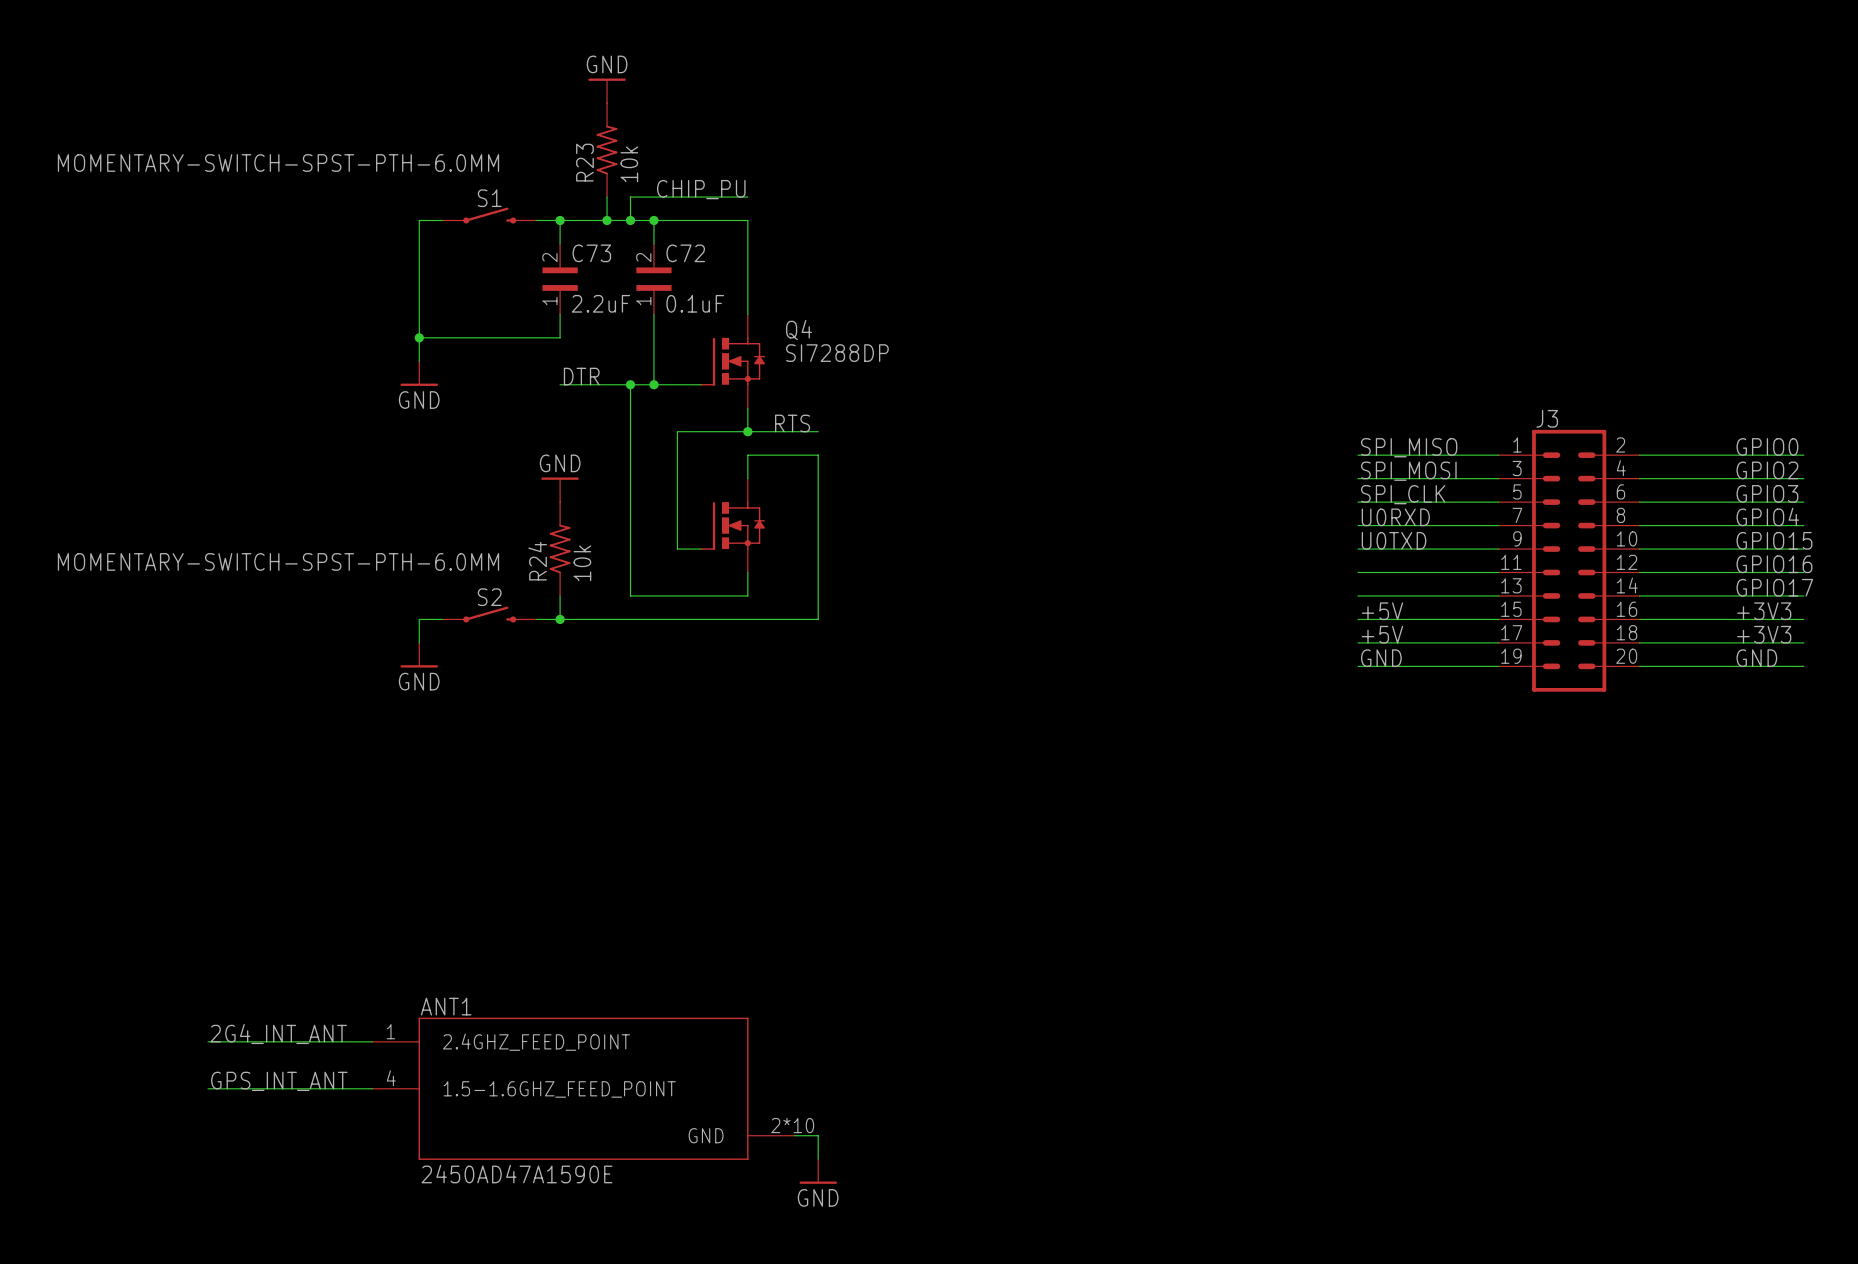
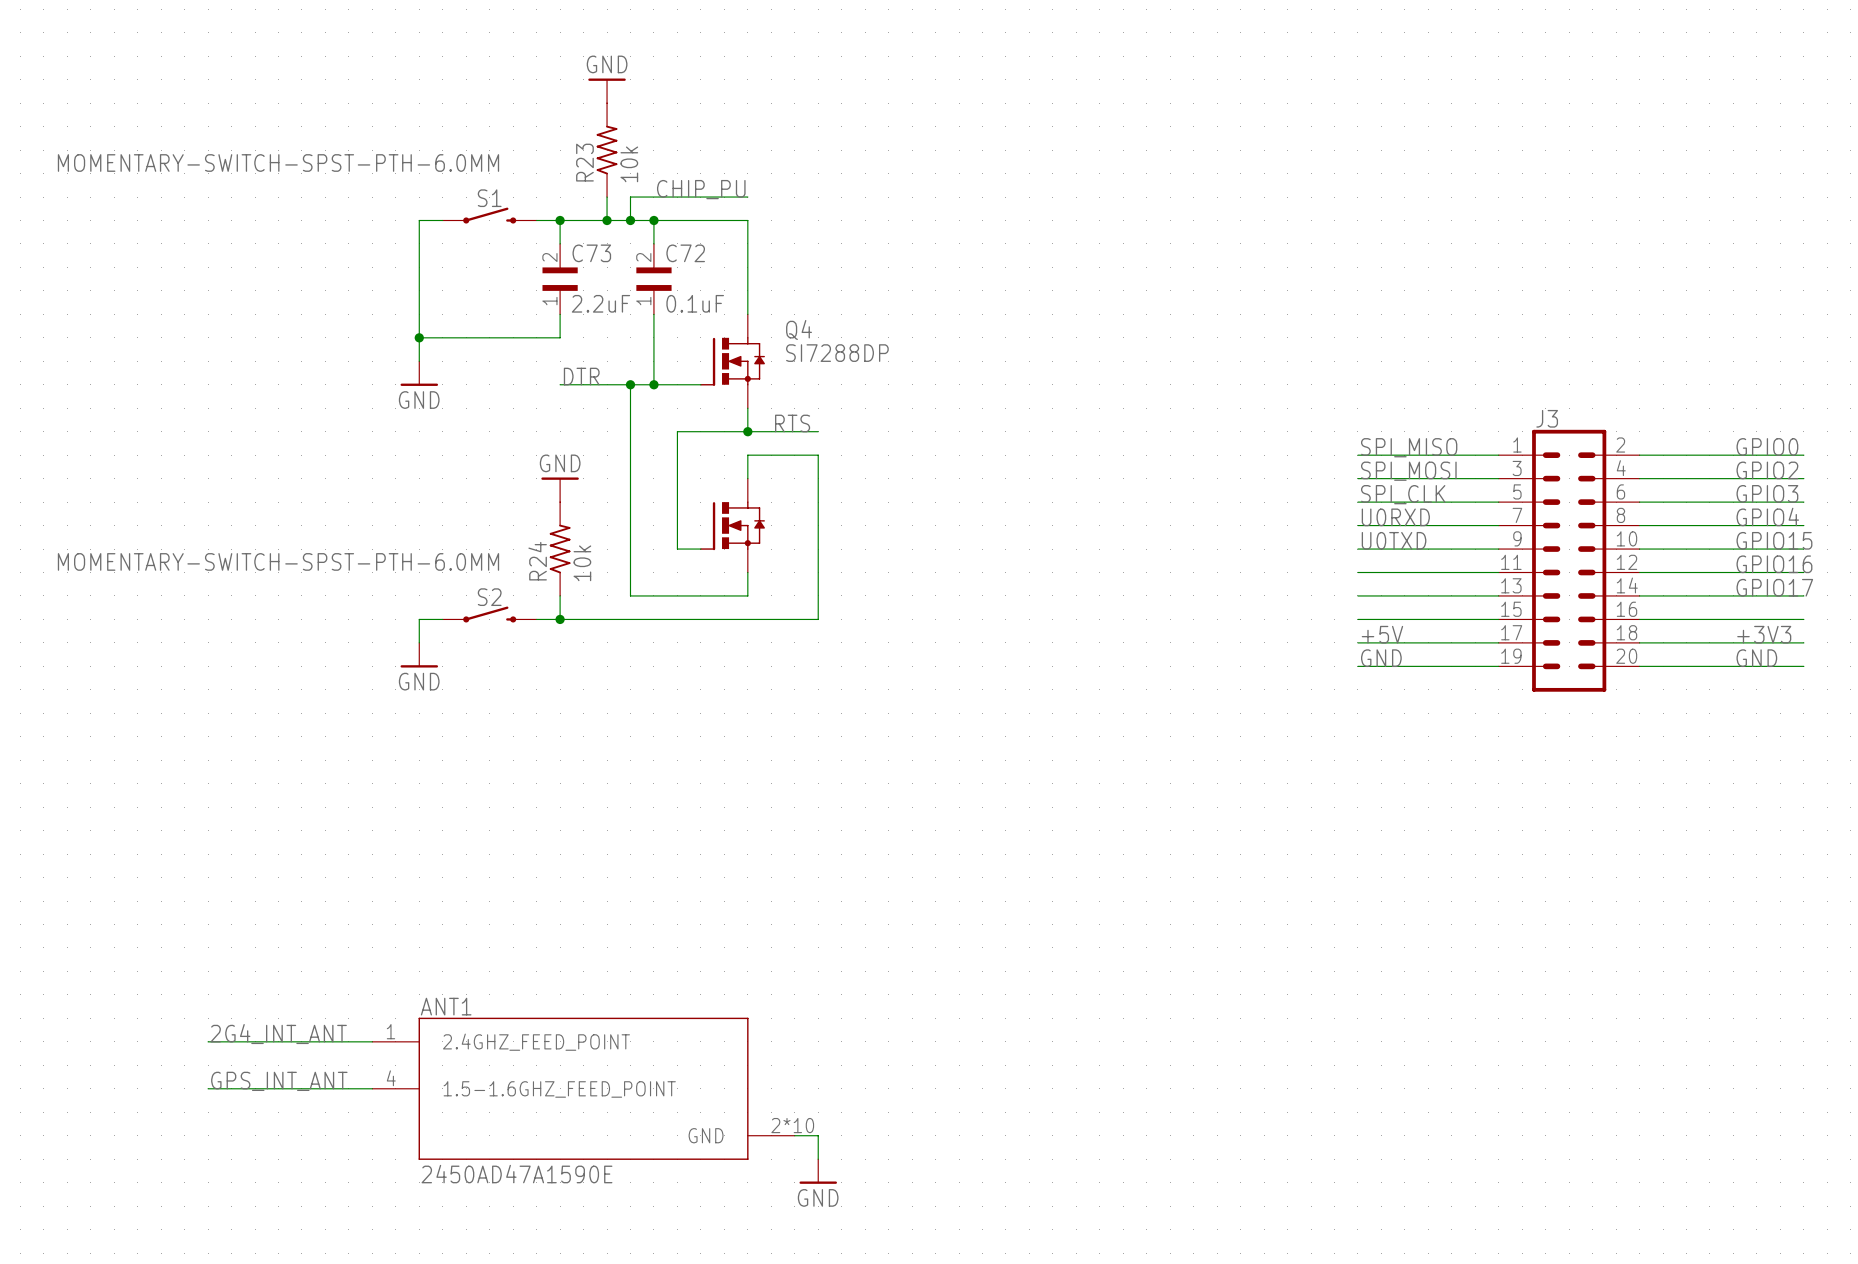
label: +5V (1382, 611) -> none
label: +3V3 (1764, 611) -> none

